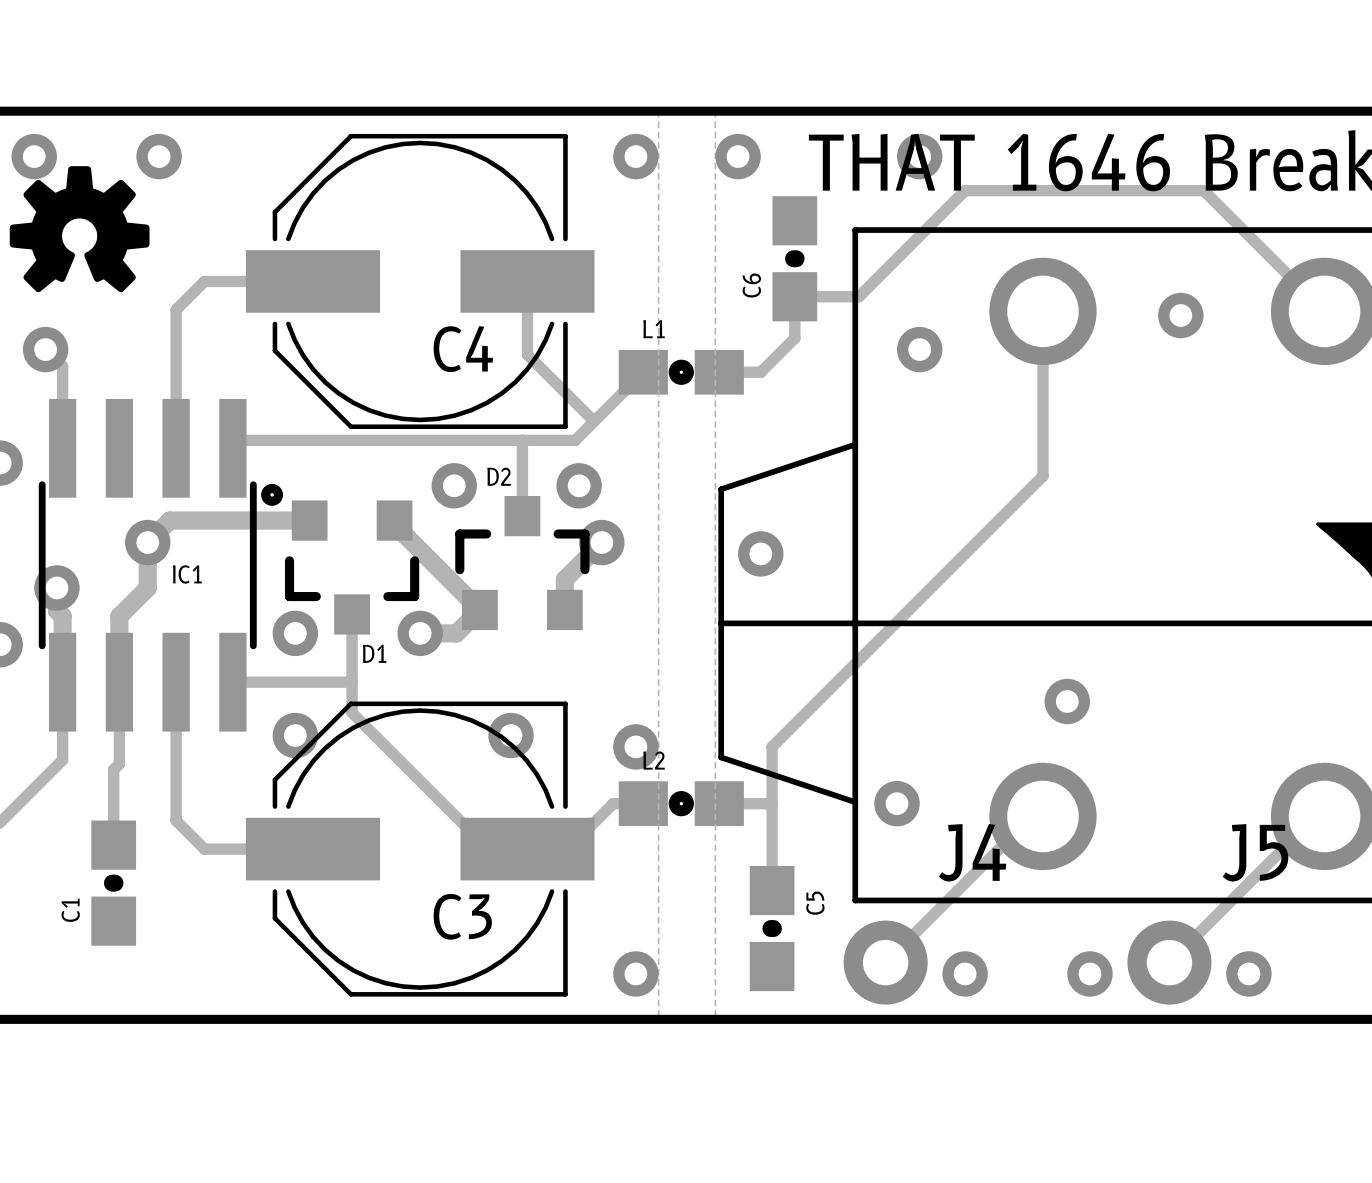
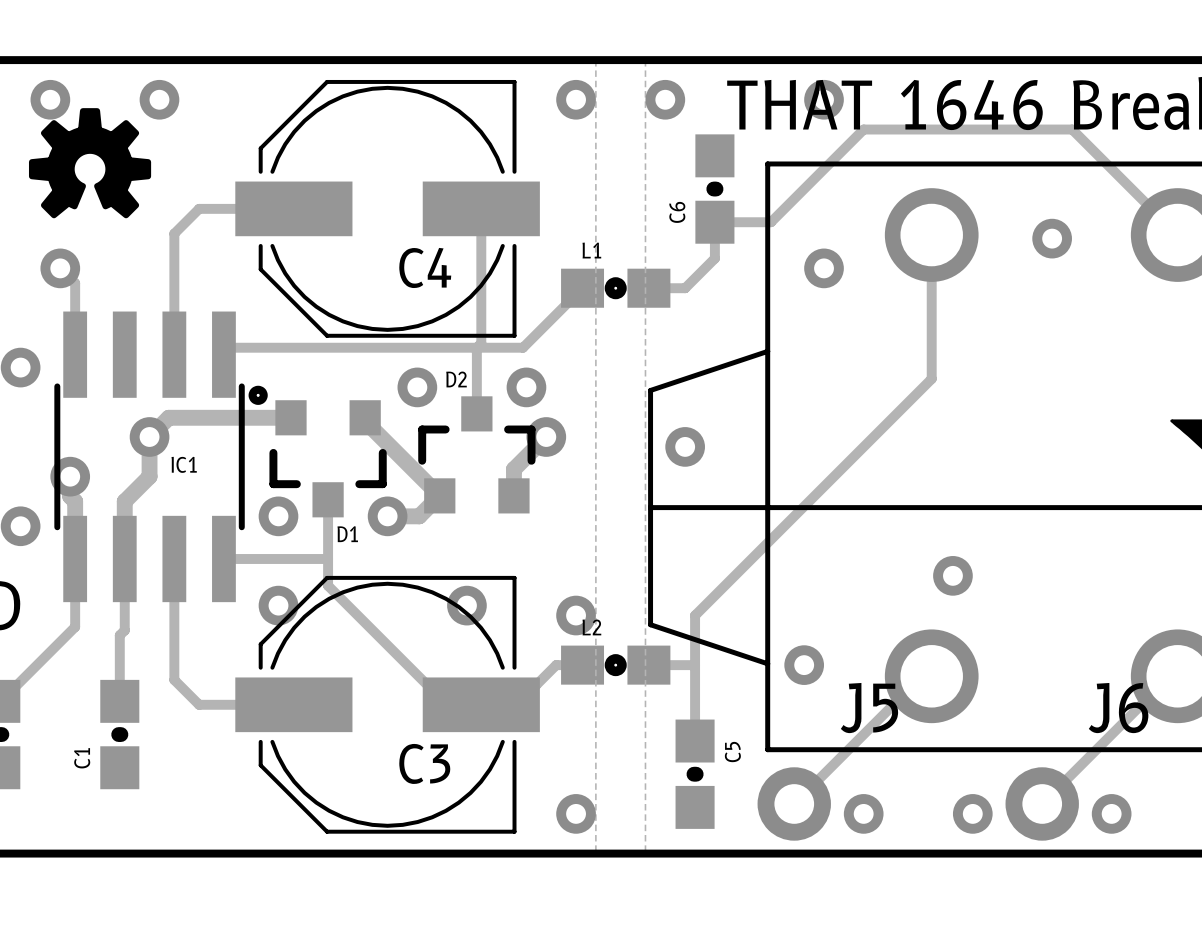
track: (527, 354) (594, 421) -> (481, 272) (481, 343) (476, 347)
J4 name: J4 (972, 852) -> J5 (869, 708)
J5 name: J5 (1255, 852) -> J6 (1118, 708)

